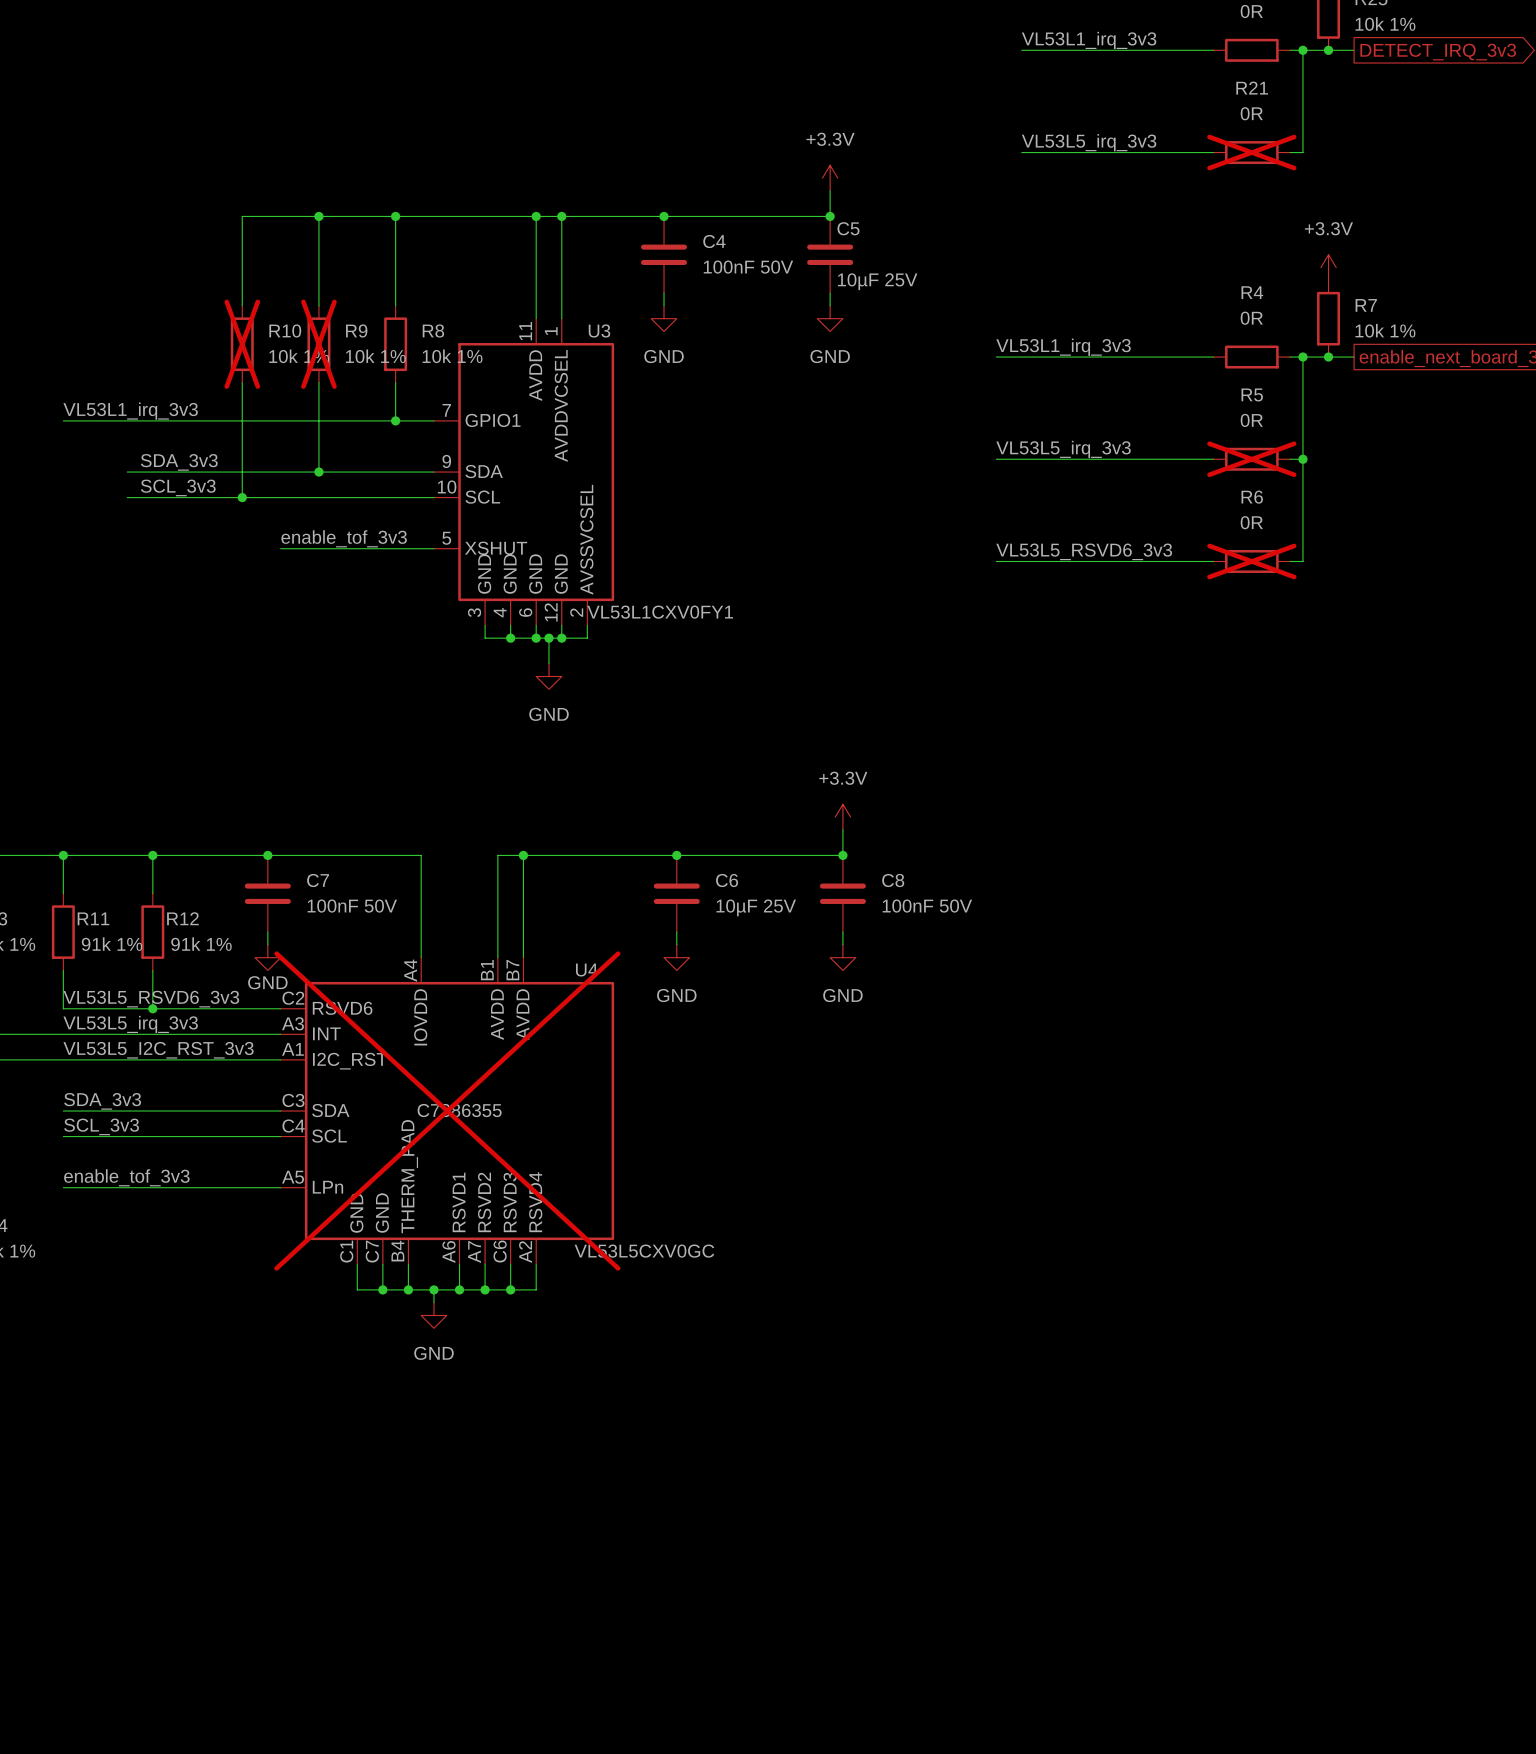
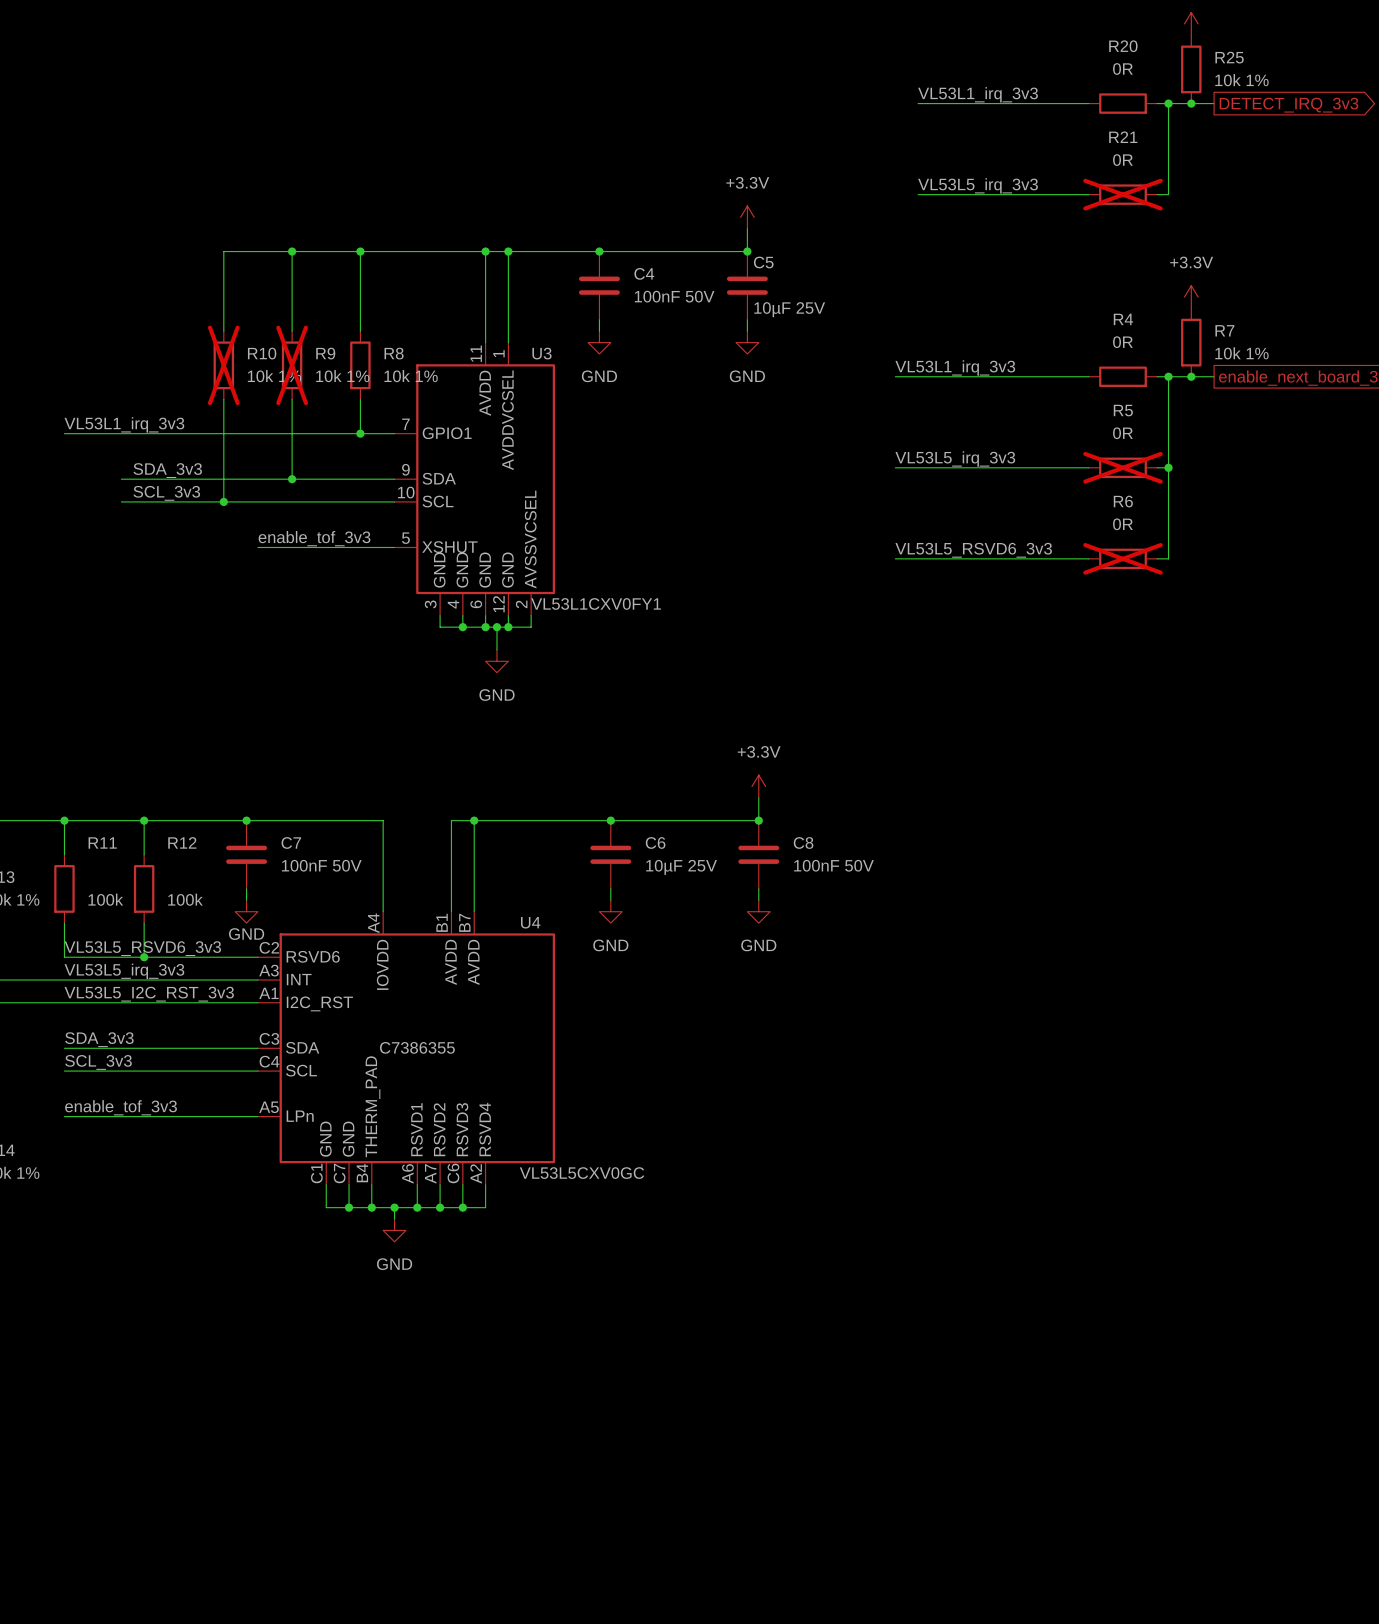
R11 name position: R11 (93, 918) -> R11 (102, 842)
R12 name position: R12 (182, 918) -> R12 (182, 842)
R11 value: 91k 1% (112, 944) -> 100k (105, 899)
R12 value: 91k 1% (201, 944) -> 100k (185, 899)
U4 do-not-place cross: (447, 1111) -> none

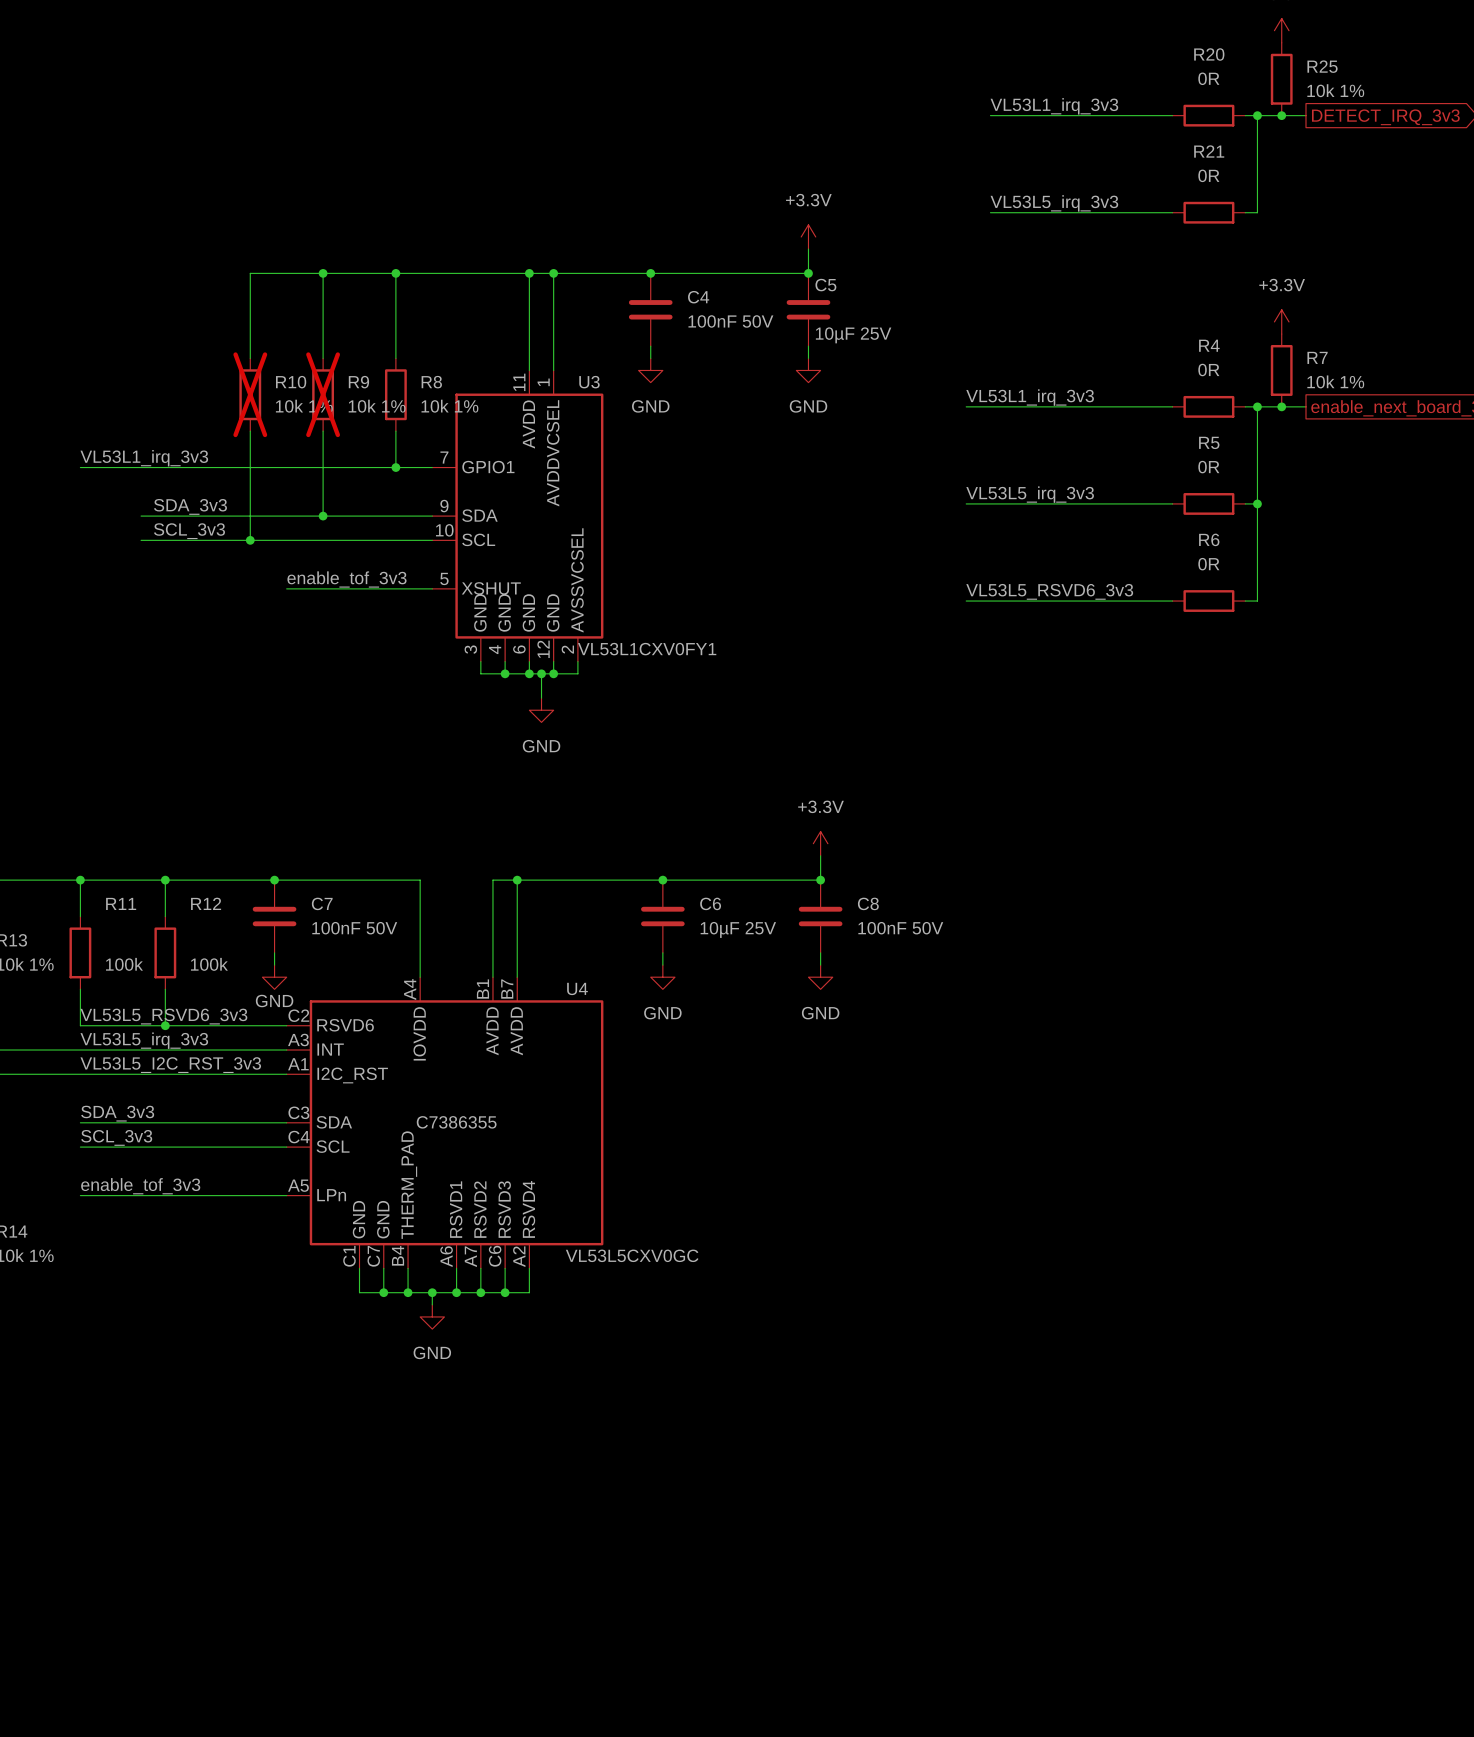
R21 do-not-place cross: (1123, 194) -> none
R5 do-not-place cross: (1123, 467) -> none
R6 do-not-place cross: (1123, 558) -> none

